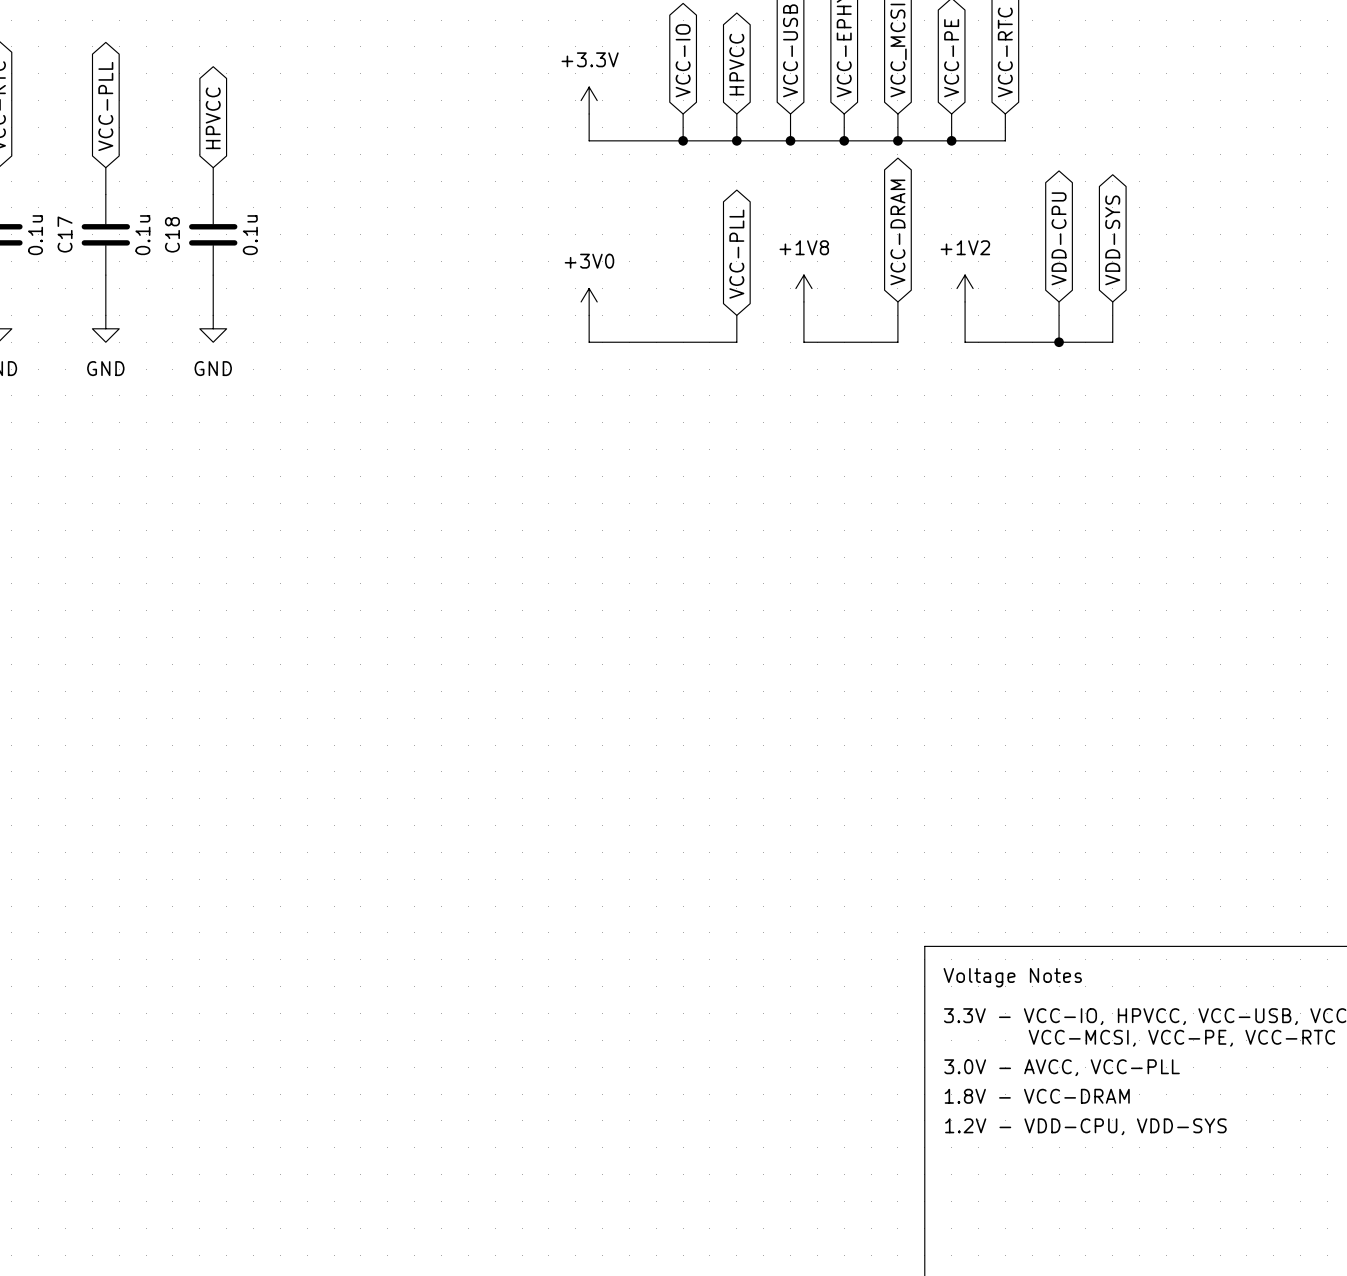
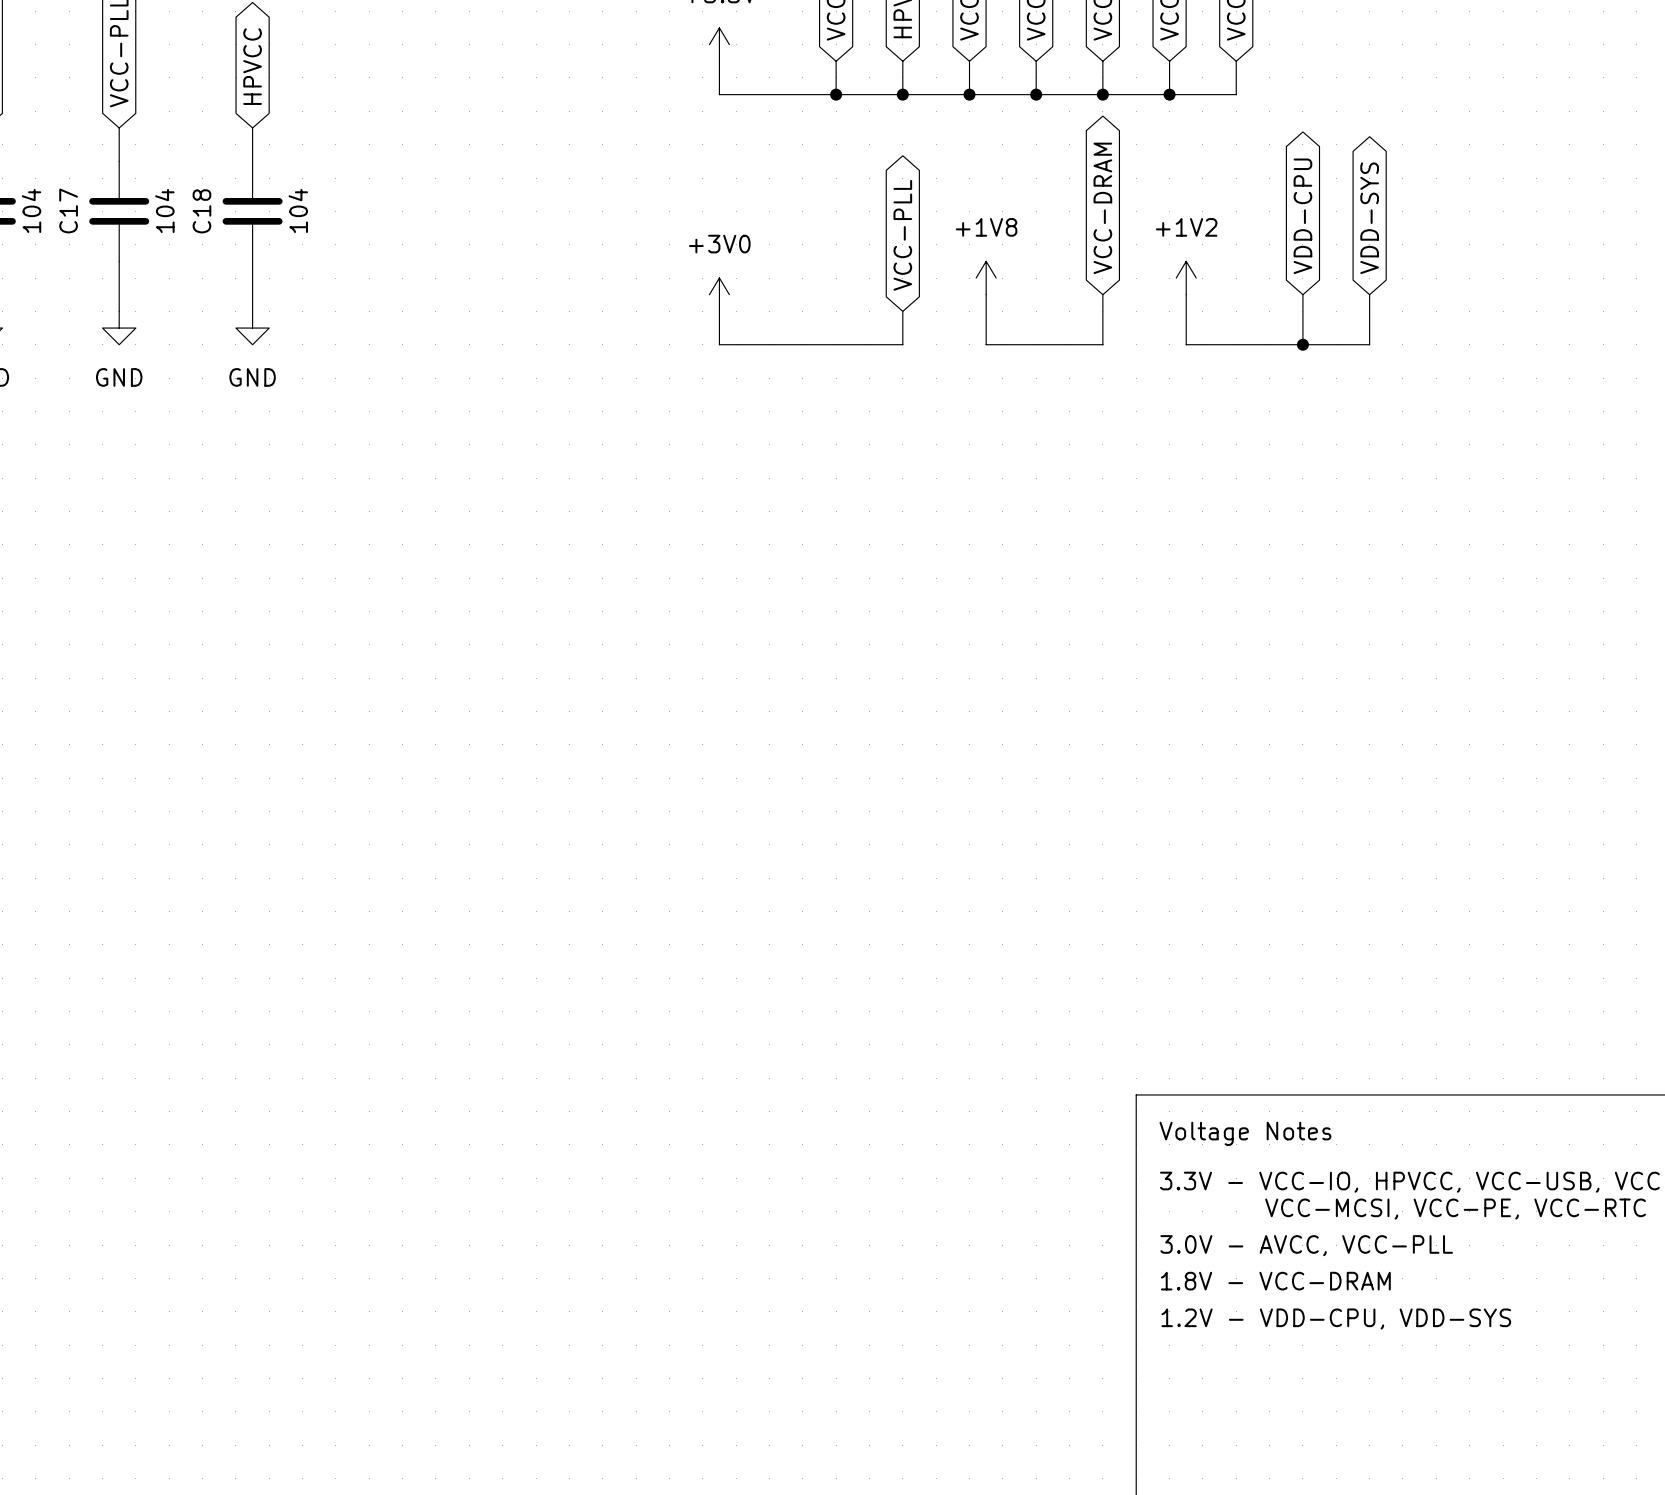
part value: 0.1u (35, 235) -> 104 (31, 210)
C17 value: 0.1u (142, 235) -> 104 (164, 210)
C18 value: 0.1u (250, 235) -> 104 (298, 210)

